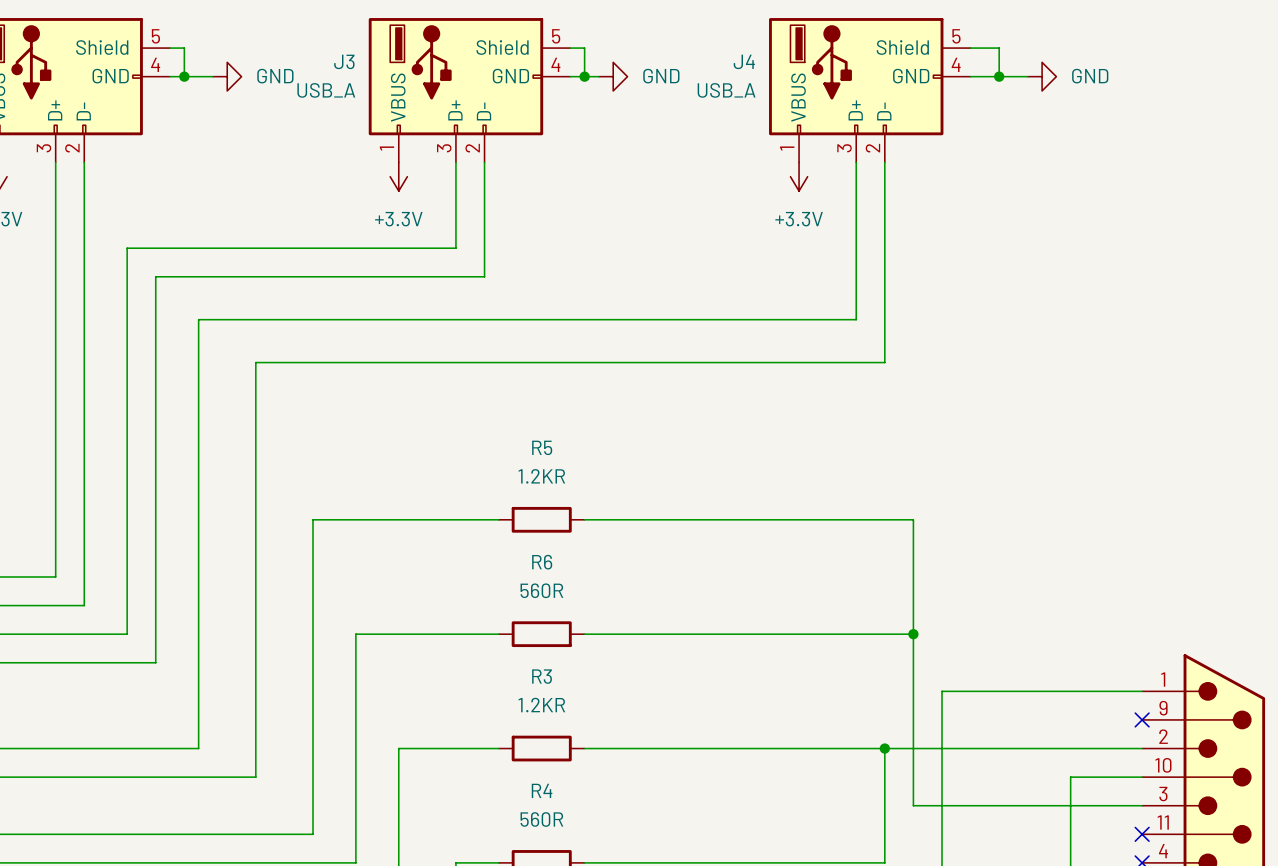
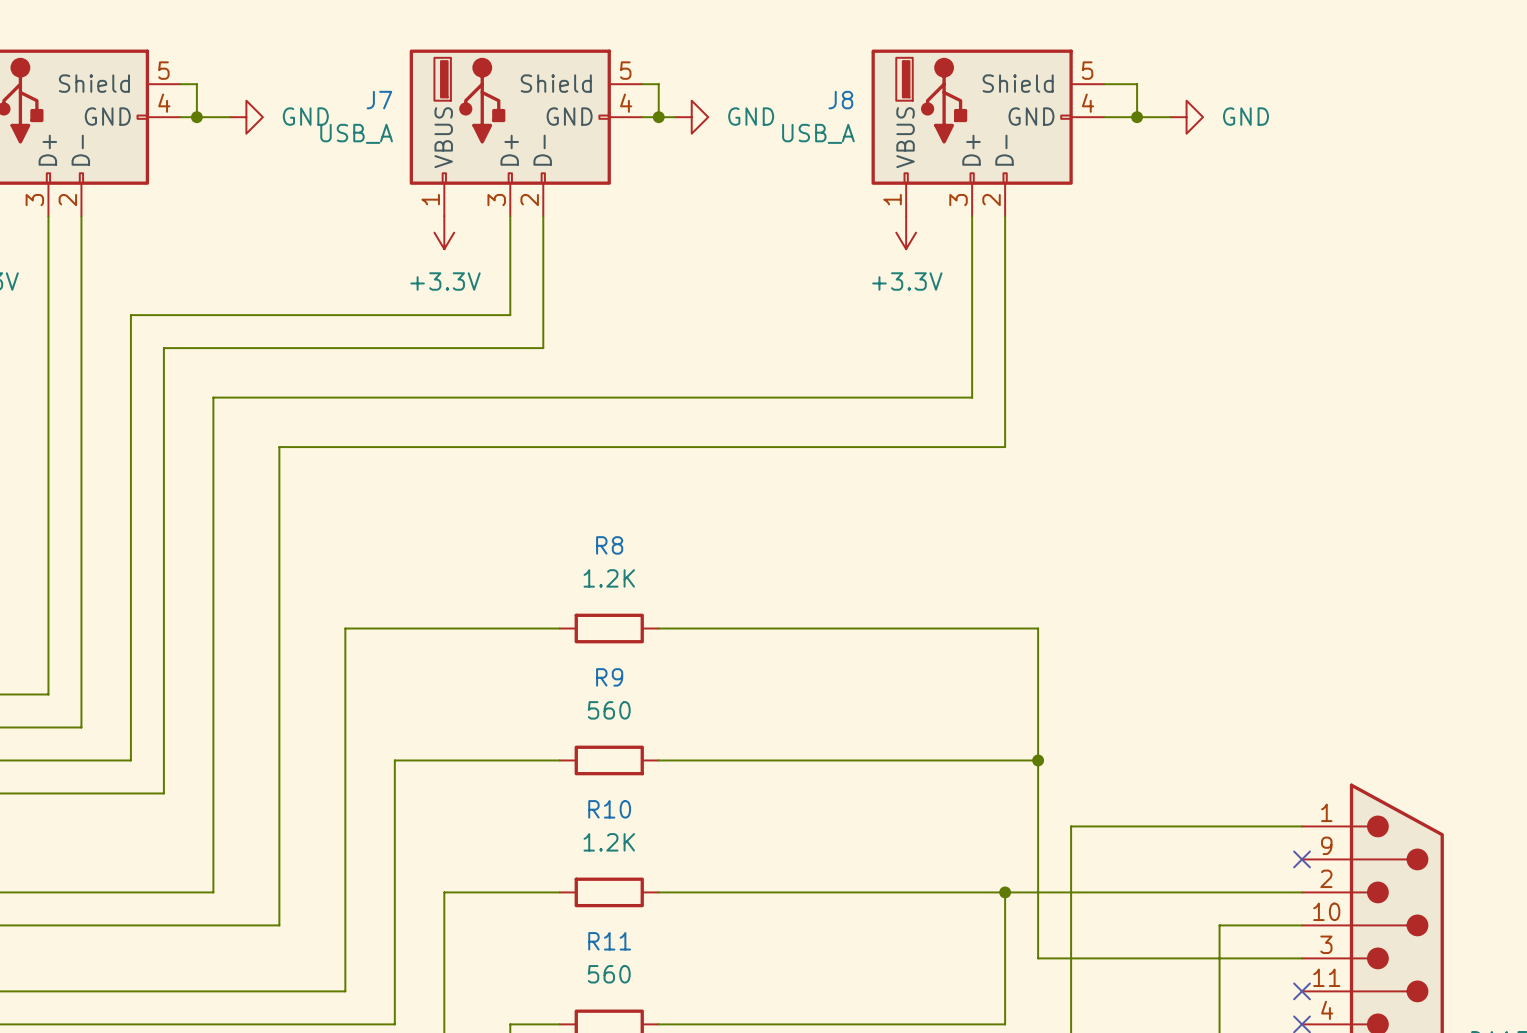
J3 name: J3 (344, 61) -> J7 (379, 100)
J4 name: J4 (744, 61) -> J8 (840, 100)
R5 name: R5 (542, 447) -> R8 (609, 545)
R5 value: 1.2KR (541, 476) -> 1.2K (609, 578)
R6 name: R6 (542, 562) -> R9 (609, 677)
R6 value: 560R (541, 590) -> 560 (609, 710)
R3 name: R3 (542, 676) -> R10 (609, 809)
R3 value: 1.2KR (541, 705) -> 1.2K (609, 842)
R4 name: R4 (542, 790) -> R11 (609, 941)
R4 value: 560R (541, 819) -> 560 (609, 974)

